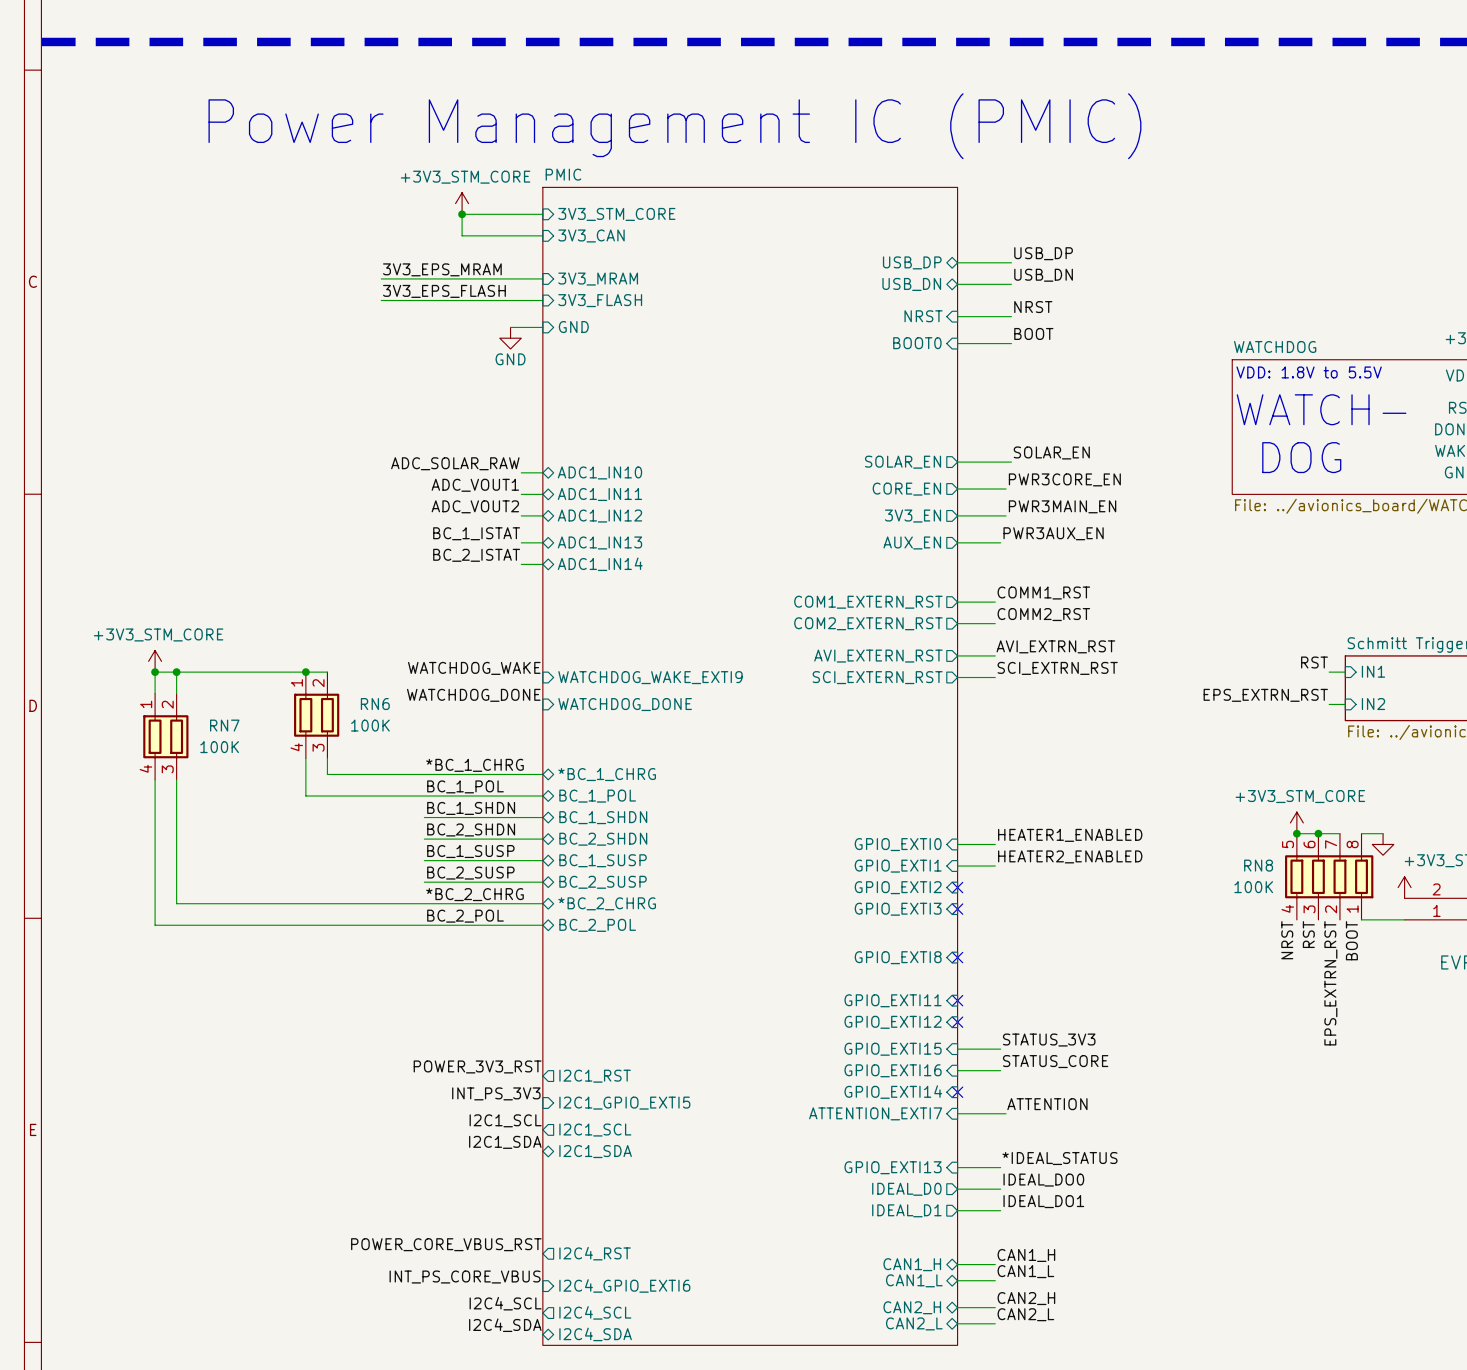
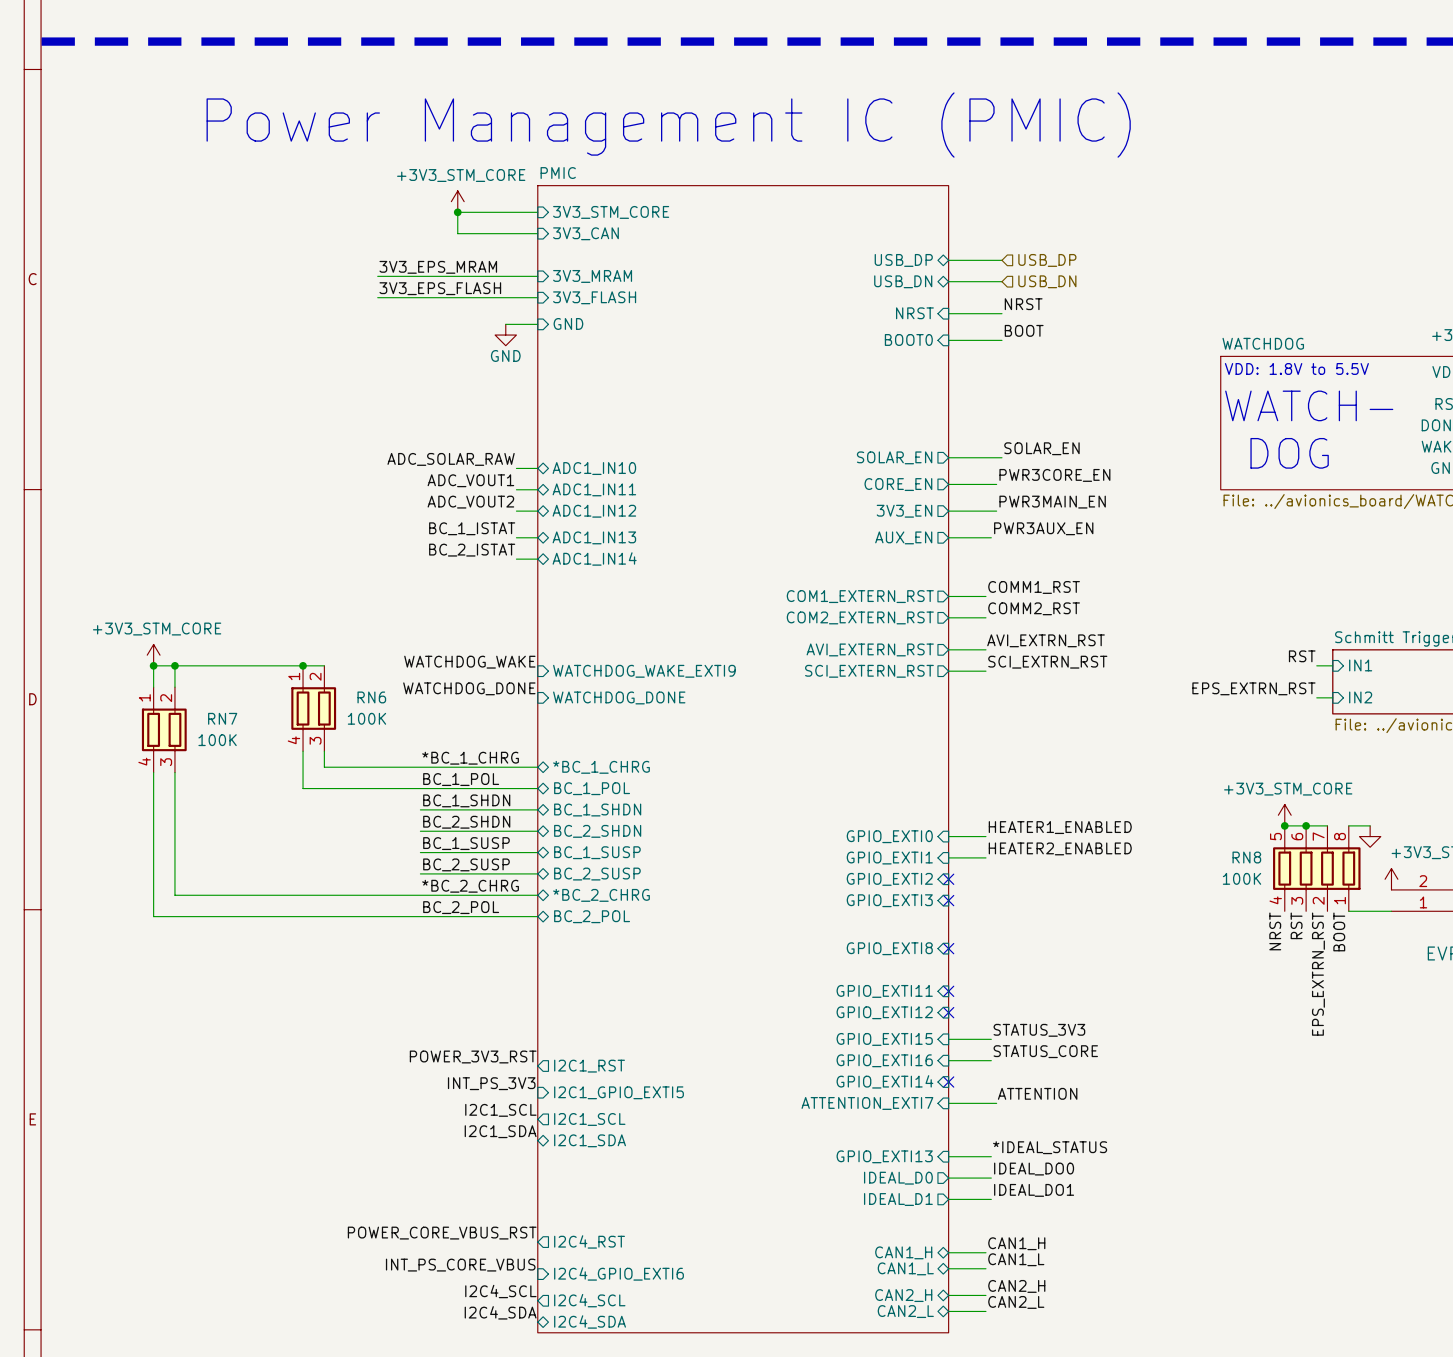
label: USB_DP (1043, 253) -> none
hierarchical label: none -> USB_DP (1047, 260)
label: USB_DN (1043, 275) -> none
hierarchical label: none -> USB_DN (1047, 281)

